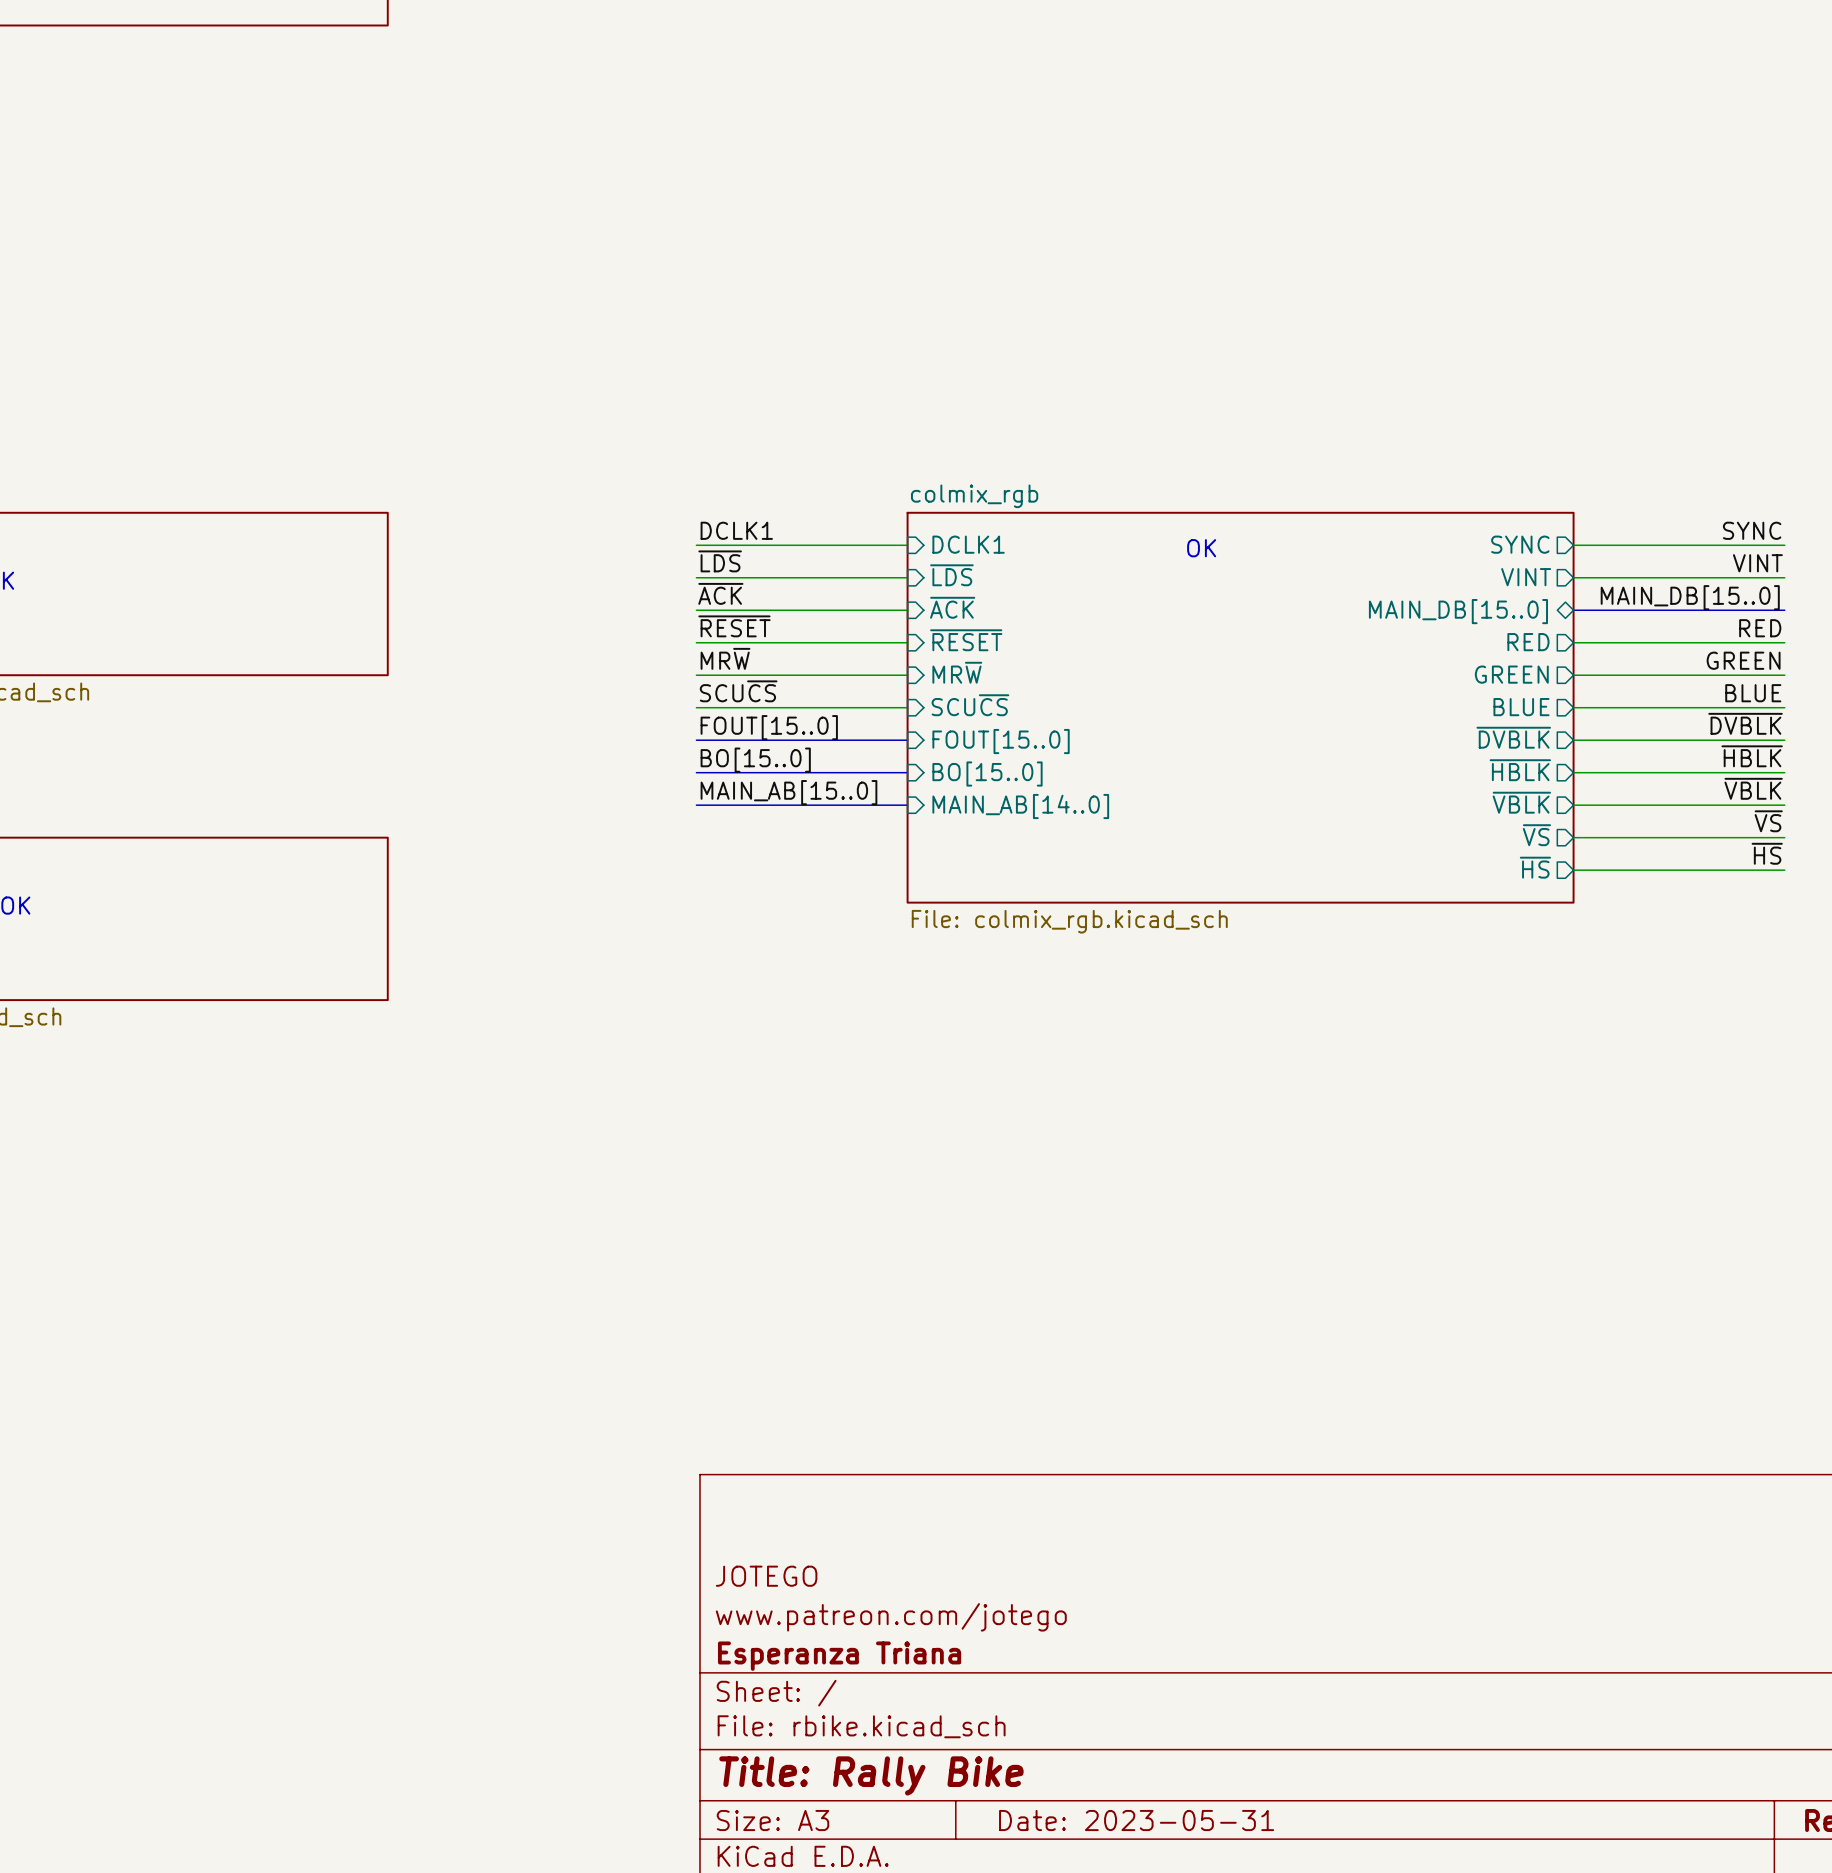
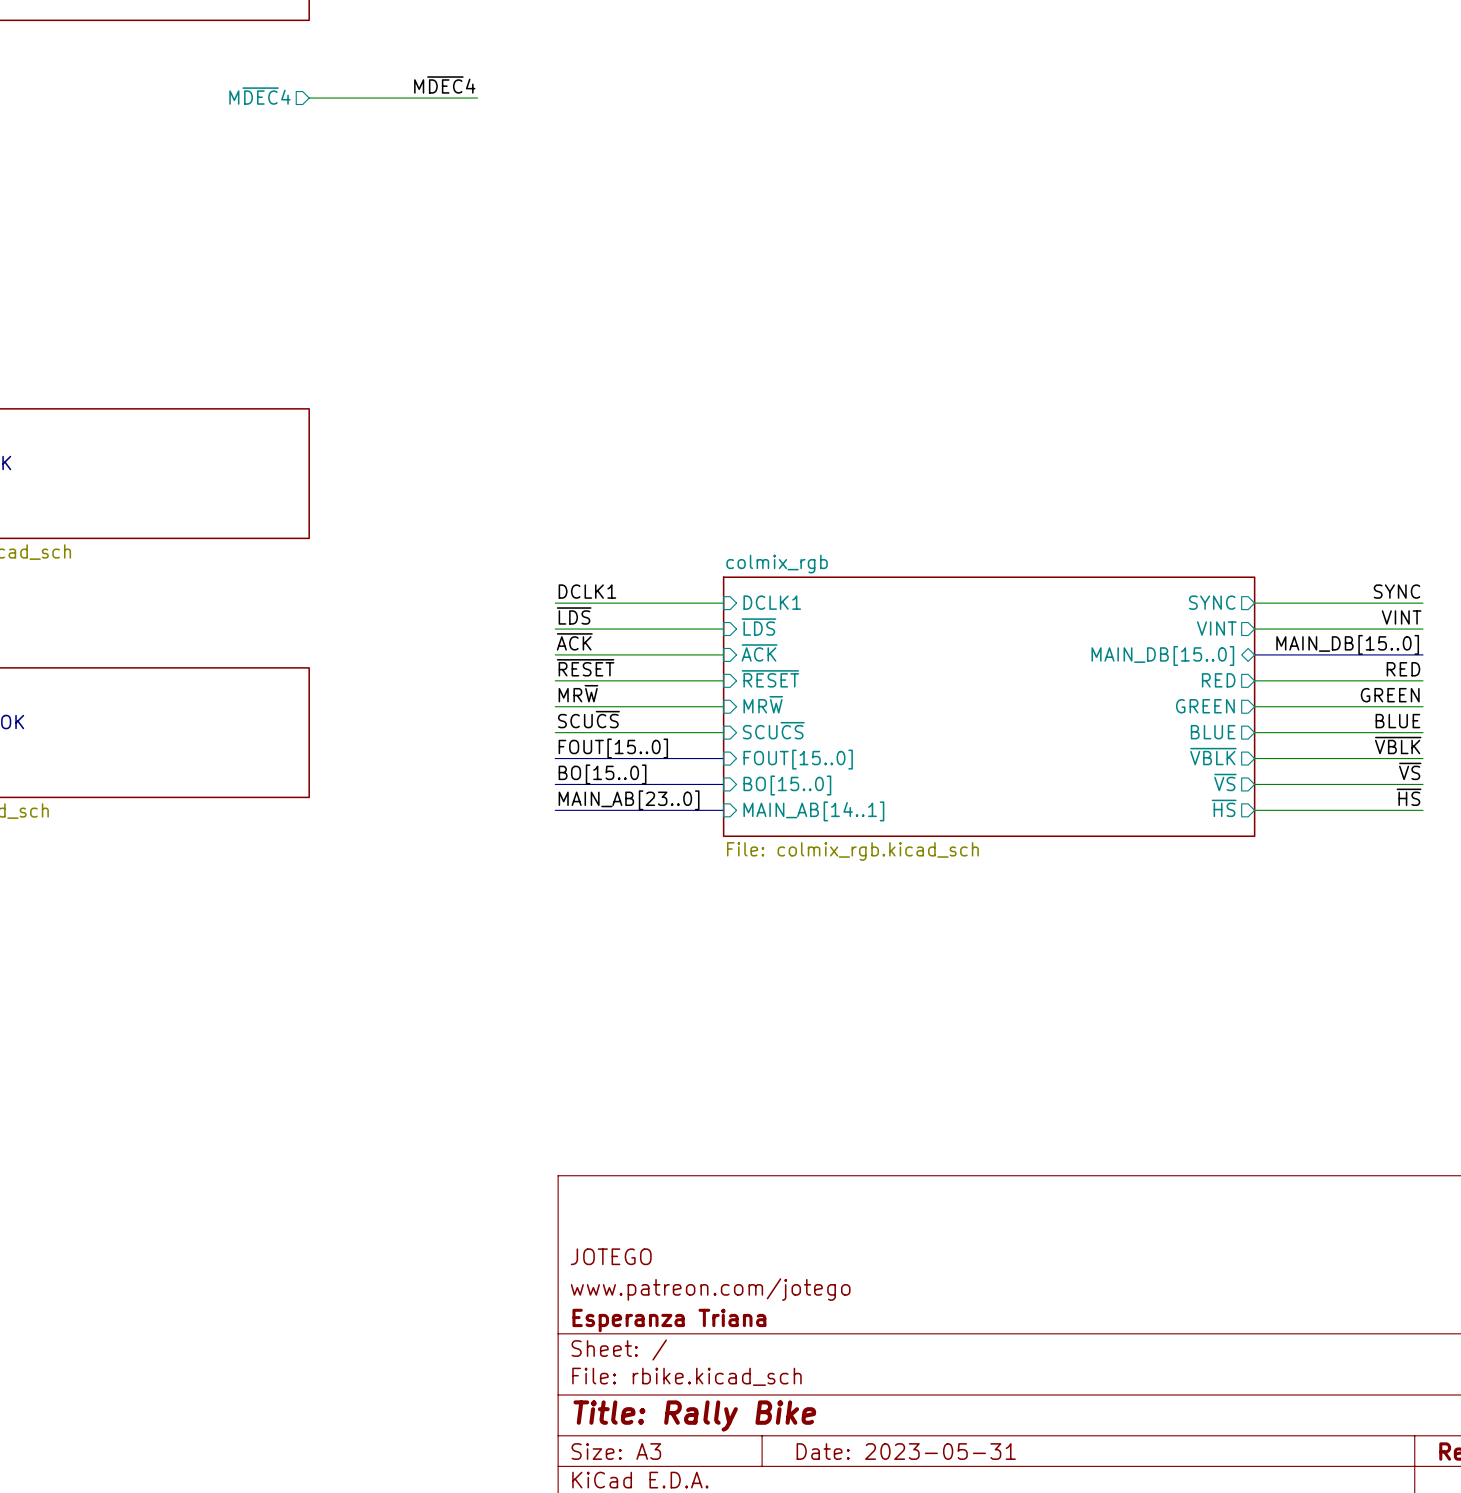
label: none -> M~{DEC}4 (444, 84)
sheet pin: none -> M~{DEC}4 (259, 96)
wire: none -> (309, 98) (477, 98)
label position: DCLK1 (736, 530) -> DCLK1 (587, 591)
label position: SYNC (1752, 530) -> SYNC (1397, 591)
sheet pin position: DCLK1 (968, 544) -> DCLK1 (772, 602)
sheet pin position: SYNC (1520, 544) -> SYNC (1212, 602)
wire: (696, 545) (907, 545) -> (555, 603) (723, 603)
wire: (1573, 545) (1784, 545) -> (1254, 603) (1423, 603)
text: OK (1201, 548) -> none
label position: ~{LDS} (720, 561) -> ~{LDS} (574, 615)
label position: VINT (1757, 563) -> VINT (1401, 617)
sheet pin position: ~{LDS} (951, 575) -> ~{LDS} (758, 627)
wire: (696, 577) (907, 577) -> (555, 629) (723, 629)
sheet pin position: VINT (1526, 577) -> VINT (1216, 628)
wire: (1573, 577) (1784, 577) -> (1254, 629) (1423, 629)
label position: ~{ACK} (720, 593) -> ~{ACK} (574, 641)
label position: MAIN_DB[15..0] (1690, 597) -> MAIN_DB[15..0] (1347, 644)
sheet pin position: ~{ACK} (952, 607) -> ~{ACK} (759, 652)
wire: (696, 610) (907, 610) -> (555, 654) (723, 654)
bus: (1573, 610) (1784, 610) -> (1254, 654) (1423, 654)
sheet pin position: MAIN_DB[15..0] (1458, 611) -> MAIN_DB[15..0] (1162, 655)
label position: ~{RESET} (734, 626) -> ~{RESET} (585, 667)
label position: RED (1760, 628) -> RED (1403, 669)
sheet pin position: ~{RESET} (966, 640) -> ~{RESET} (770, 678)
wire: (696, 642) (907, 642) -> (555, 680) (723, 680)
sheet pin position: RED (1528, 642) -> RED (1218, 680)
wire: (1573, 642) (1784, 642) -> (1254, 680) (1423, 680)
label position: MR~{W} (725, 658) -> MR~{W} (578, 693)
label position: GREEN (1743, 660) -> GREEN (1390, 695)
sheet pin position: MR~{W} (957, 672) -> MR~{W} (763, 704)
sheet pin position: GREEN (1511, 674) -> GREEN (1205, 706)
wire: (696, 675) (907, 675) -> (555, 706) (723, 706)
wire: (1573, 675) (1784, 675) -> (1254, 706) (1423, 706)
label position: SCU~{CS} (738, 691) -> SCU~{CS} (588, 719)
label position: BLUE (1753, 693) -> BLUE (1397, 721)
sheet pin position: SCU~{CS} (970, 705) -> SCU~{CS} (773, 730)
wire: (696, 707) (907, 707) -> (555, 732) (723, 732)
sheet colmix_rgb: File: colmix_rgb.kicad_sch (1240, 707) -> none
sheet pin position: BLUE (1521, 707) -> BLUE (1213, 732)
wire: (1573, 707) (1784, 707) -> (1254, 732) (1423, 732)
label: ~{DVBLK} (1745, 723) -> none
label position: FOUT[15..0] (769, 727) -> FOUT[15..0] (613, 748)
sheet pin: ~{DVBLK} (1513, 737) -> none
bus: (696, 740) (907, 740) -> (555, 758) (723, 758)
wire: (1573, 740) (1784, 740) -> (1254, 758) (1423, 758)
sheet pin position: FOUT[15..0] (1001, 741) -> FOUT[15..0] (798, 759)
label: ~{HBLK} (1752, 756) -> none
label position: BO[15..0] (755, 760) -> BO[15..0] (602, 774)
sheet pin: ~{HBLK} (1520, 770) -> none
bus: (696, 772) (907, 772) -> (555, 784) (723, 784)
wire: (1573, 772) (1784, 772) -> (1254, 784) (1423, 784)
sheet pin position: BO[15..0] (987, 774) -> BO[15..0] (787, 785)
label position: ~{VBLK} (1753, 788) -> ~{VBLK} (1398, 745)
label: MAIN_AB[15..0] (788, 792) -> none
sheet pin position: ~{VBLK} (1521, 802) -> ~{VBLK} (1213, 756)
bus: (696, 805) (907, 805) -> (555, 810) (723, 810)
wire: (1573, 805) (1784, 805) -> (1254, 810) (1423, 810)
sheet pin: MAIN_AB[14..0] (1020, 806) -> none
label position: ~{VS} (1768, 821) -> ~{VS} (1410, 771)
sheet pin position: ~{VS} (1536, 835) -> ~{VS} (1225, 782)
wire: (1573, 837) (1784, 837) -> none
label position: ~{HS} (1767, 853) -> ~{HS} (1409, 797)
sheet pin position: ~{HS} (1535, 867) -> ~{HS} (1224, 808)
wire: (1573, 870) (1784, 870) -> none
sheet colmix_rgb: none -> File: colmix_rgb.kicad_sch (989, 706)
label: none -> MAIN_AB[23..0] (629, 800)
sheet pin: none -> MAIN_AB[14..1] (813, 811)

